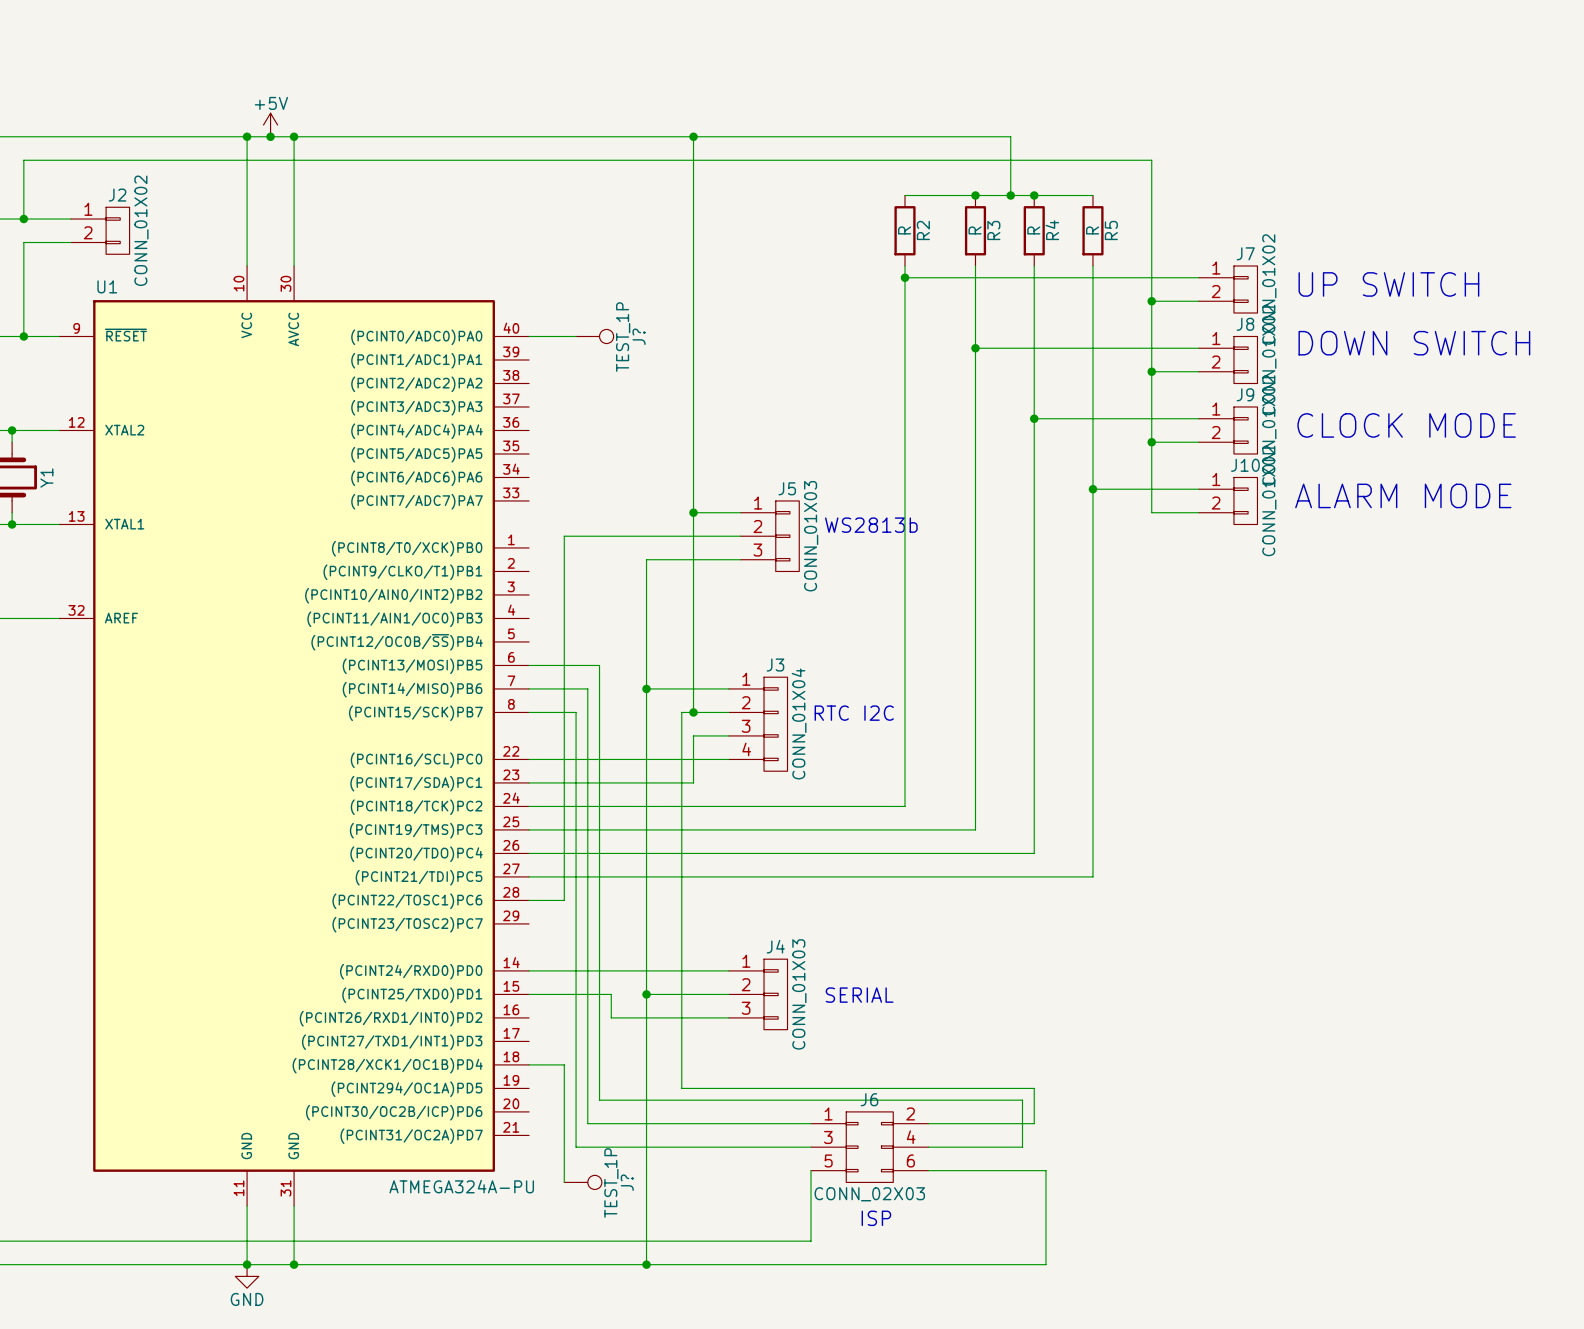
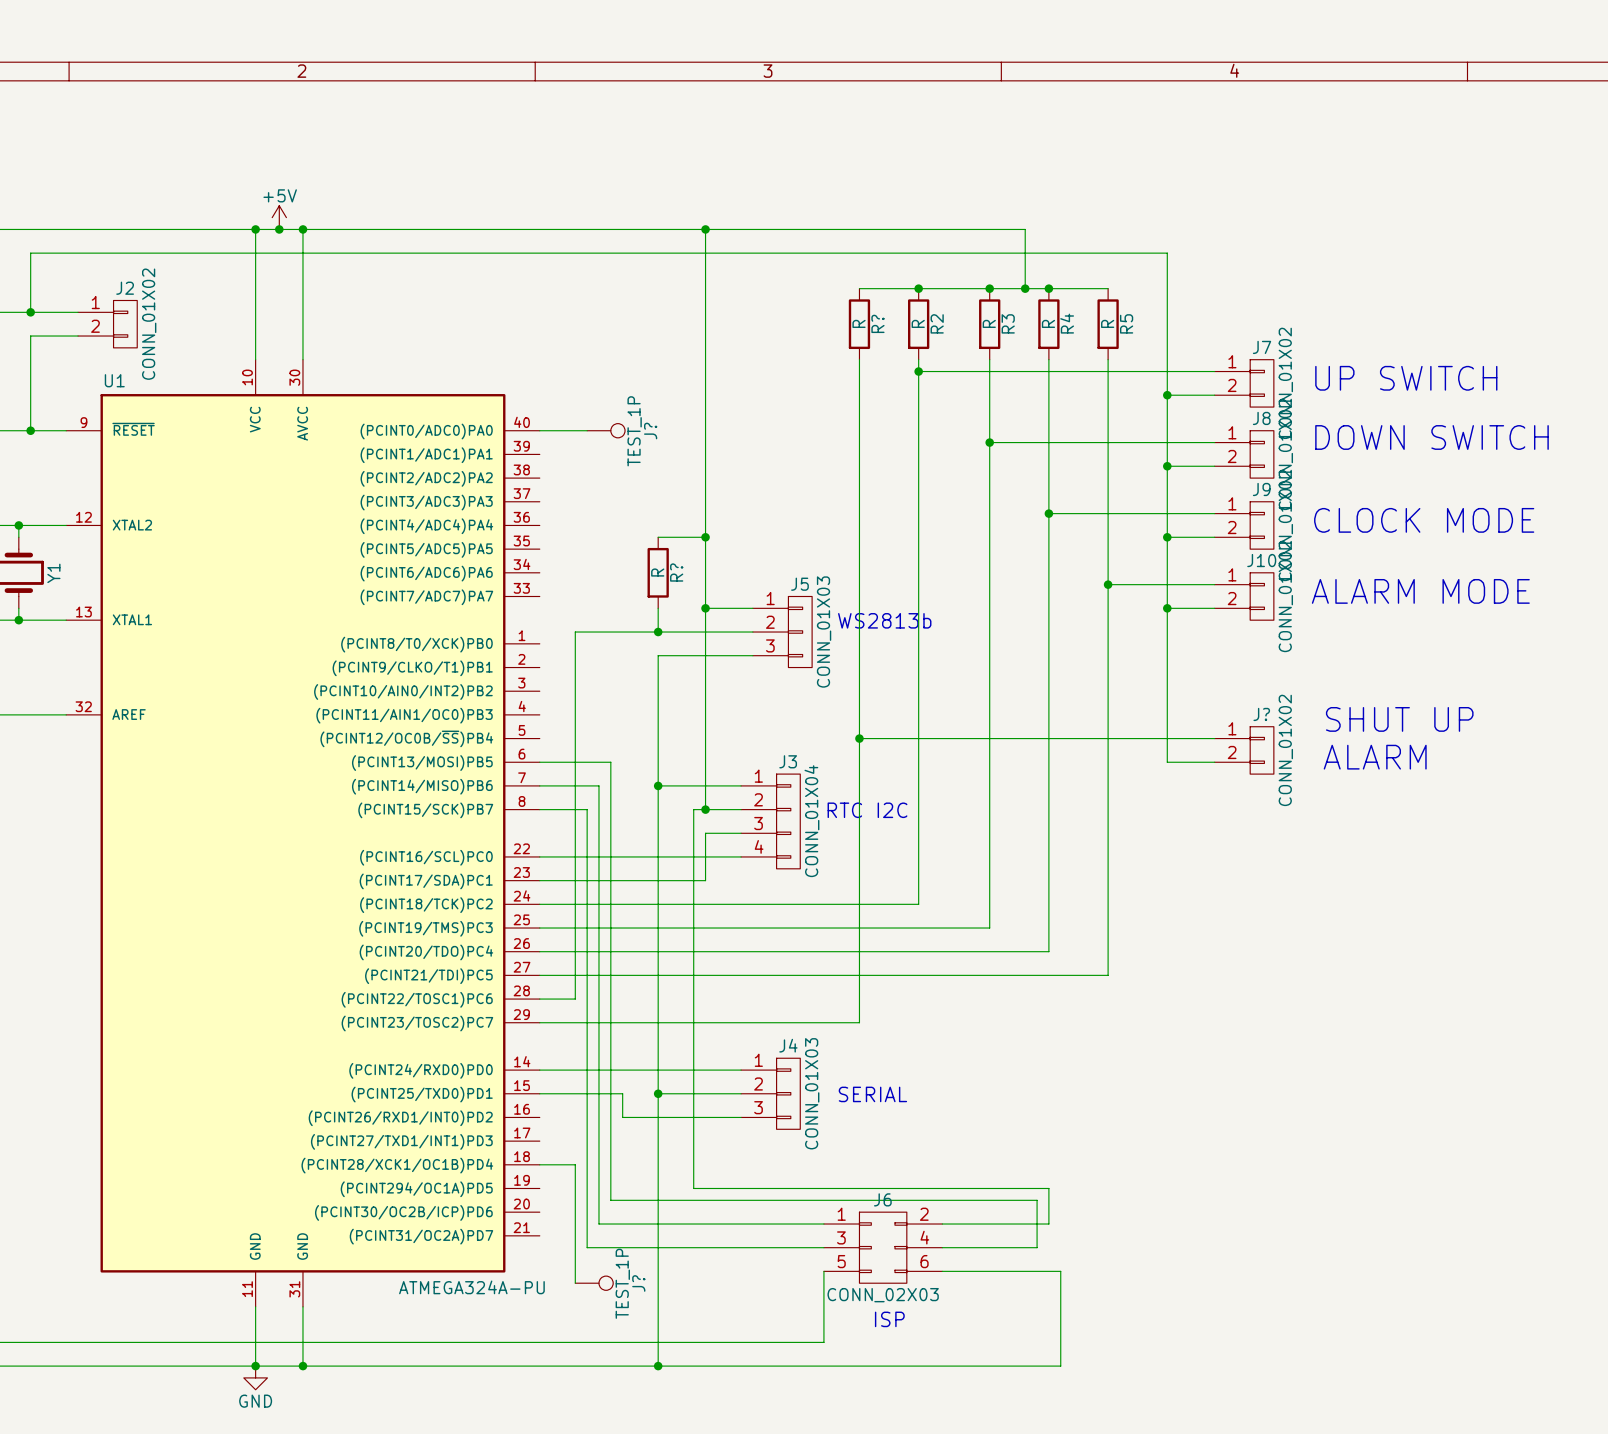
wire: none -> (859, 288) (918, 288)
junction: none -> (918, 288)
R?: none -> R (859, 324)
wire: none -> (859, 359) (859, 1022) (539, 1022)
wire: none -> (658, 537) (705, 537)
junction: none -> (705, 537)
R?: none -> R (658, 572)
wire: none -> (658, 608) (658, 632)
wire: none -> (1167, 608) (1167, 762) (1214, 762)
junction: none -> (1167, 608)
junction: none -> (658, 632)
text: none -> SHUT UP (1399, 719)
wire: none -> (859, 738) (1214, 738)
junction: none -> (859, 738)
J?: none -> CONN_01X02 (1244, 750)
text: none -> ALARM (1375, 757)

